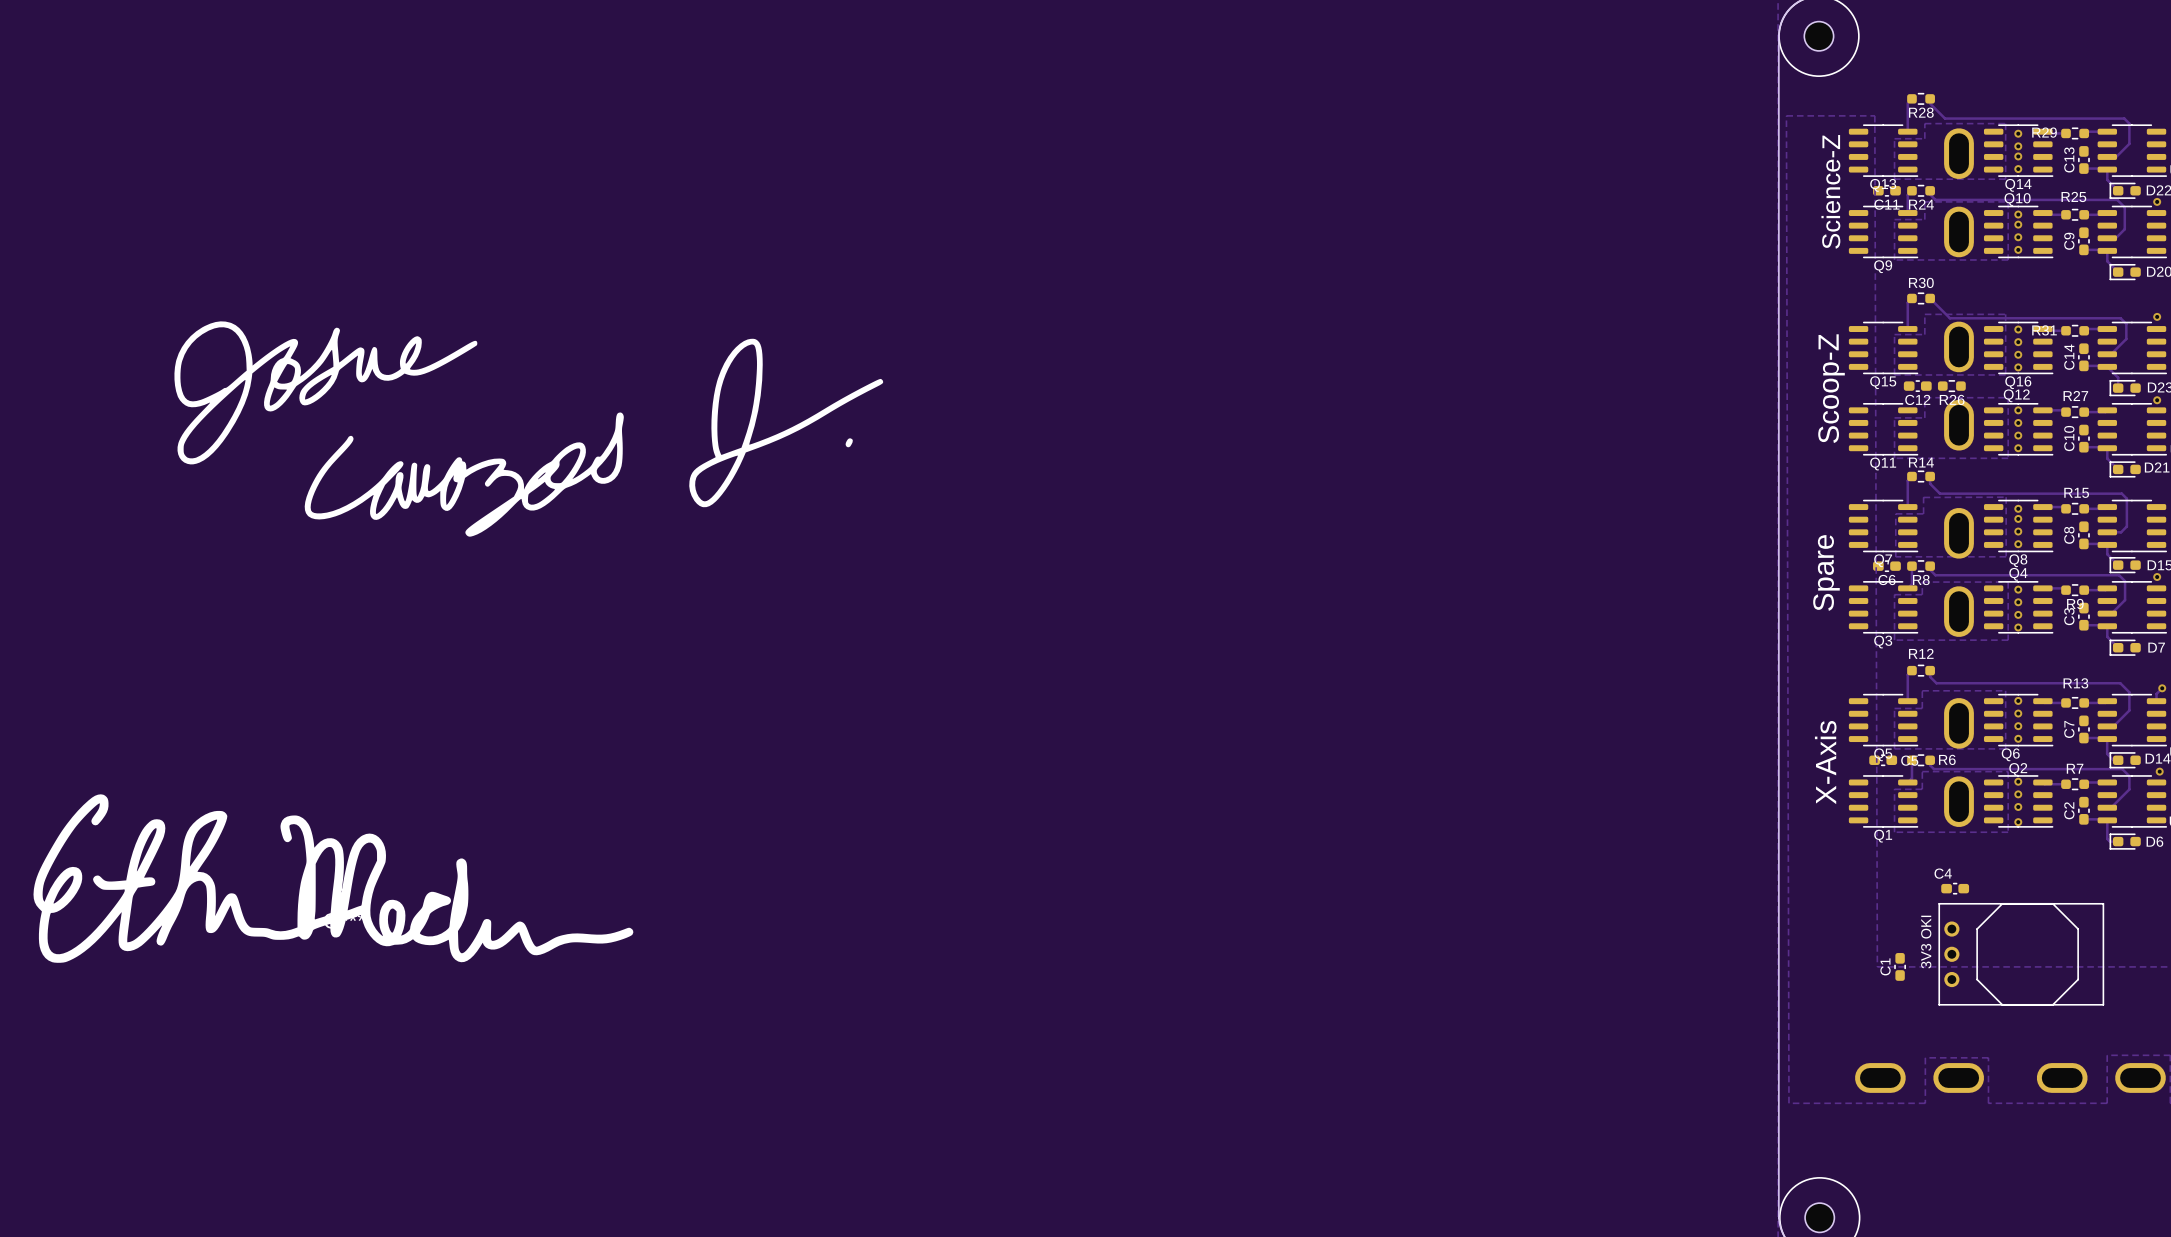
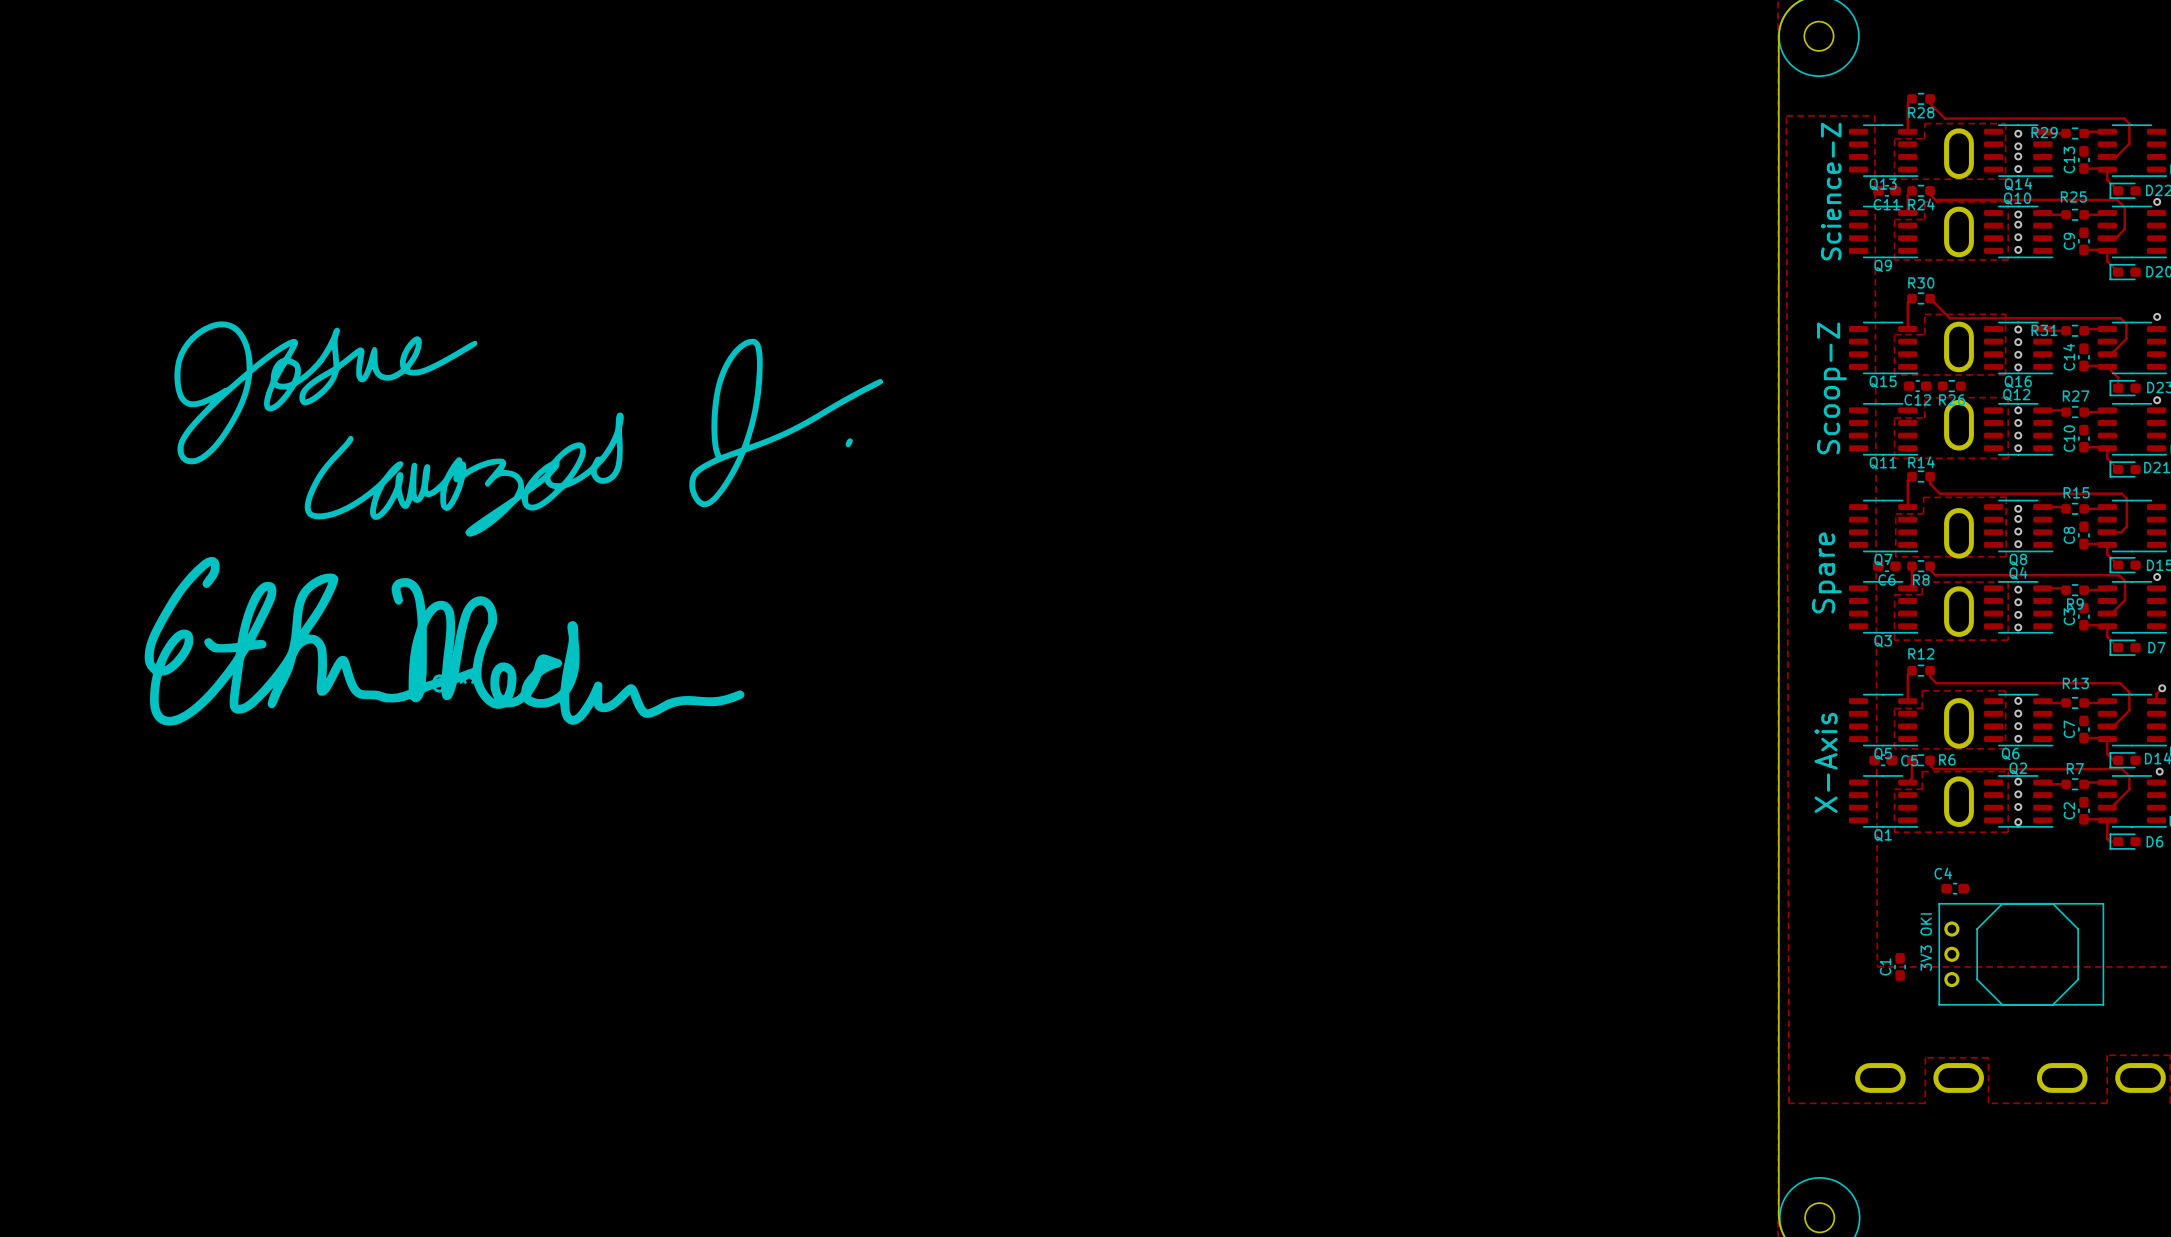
part: none -> (444, 641)
part: (333, 878) -> none

